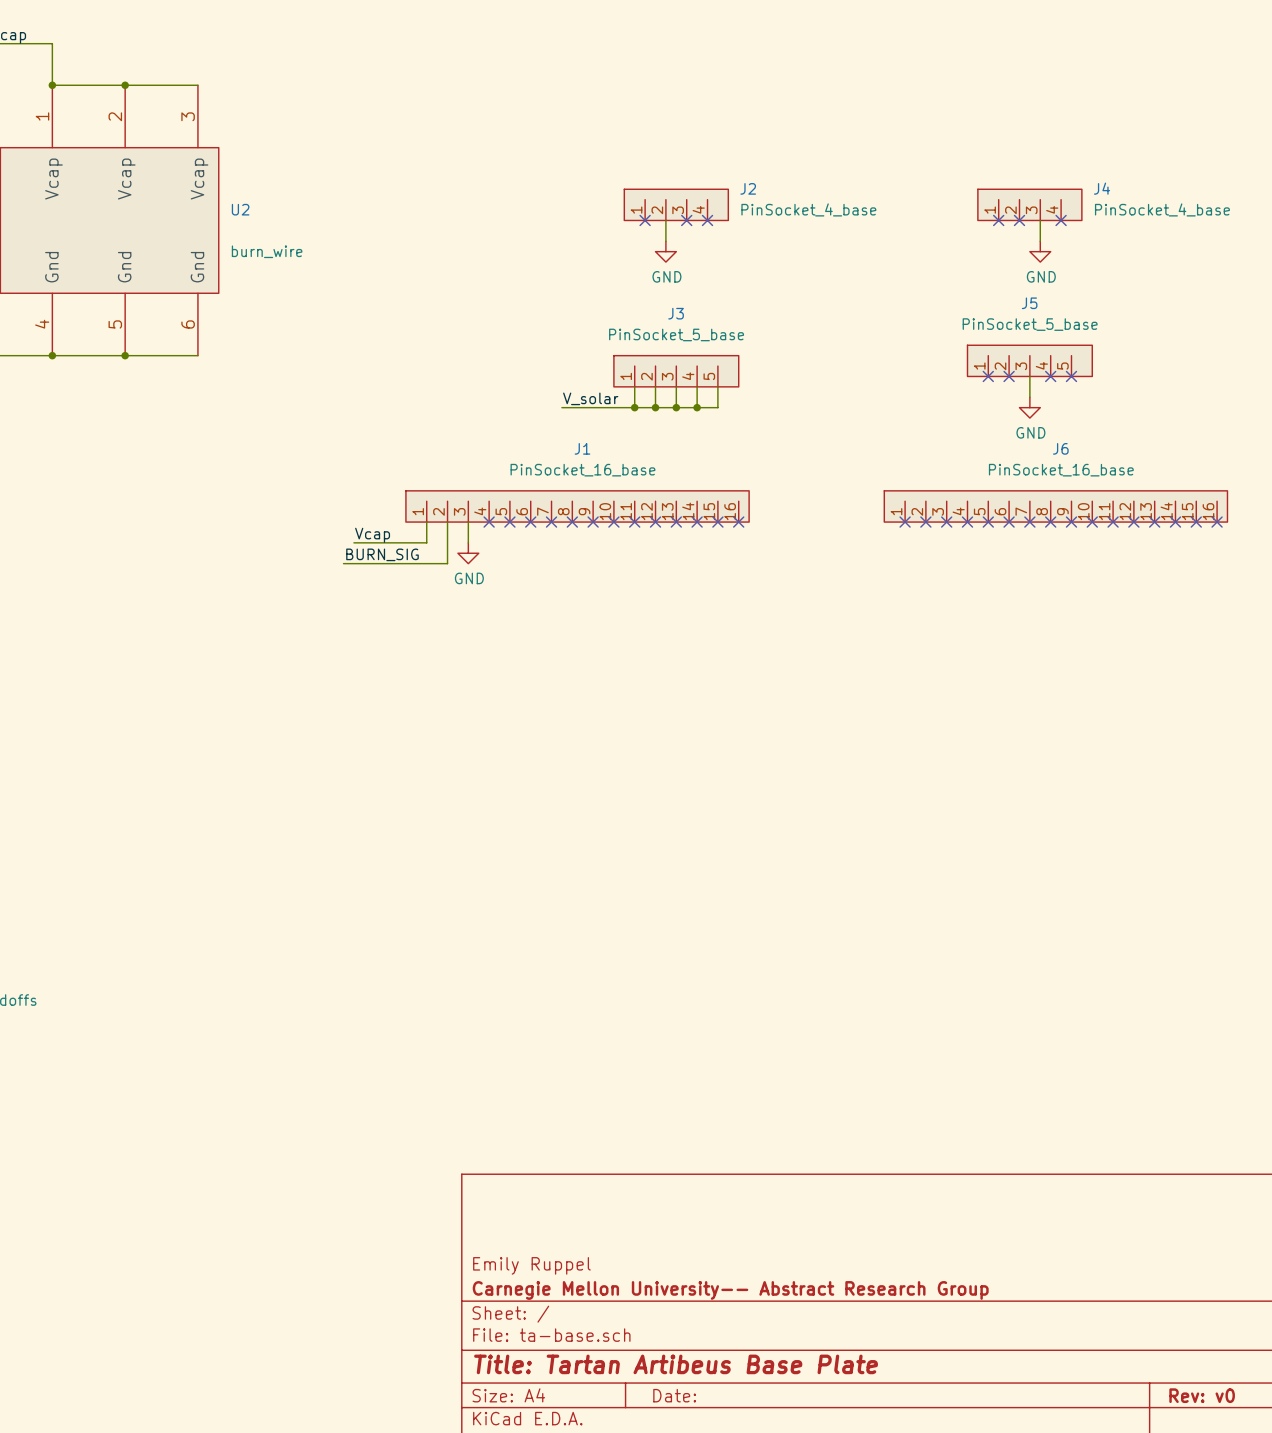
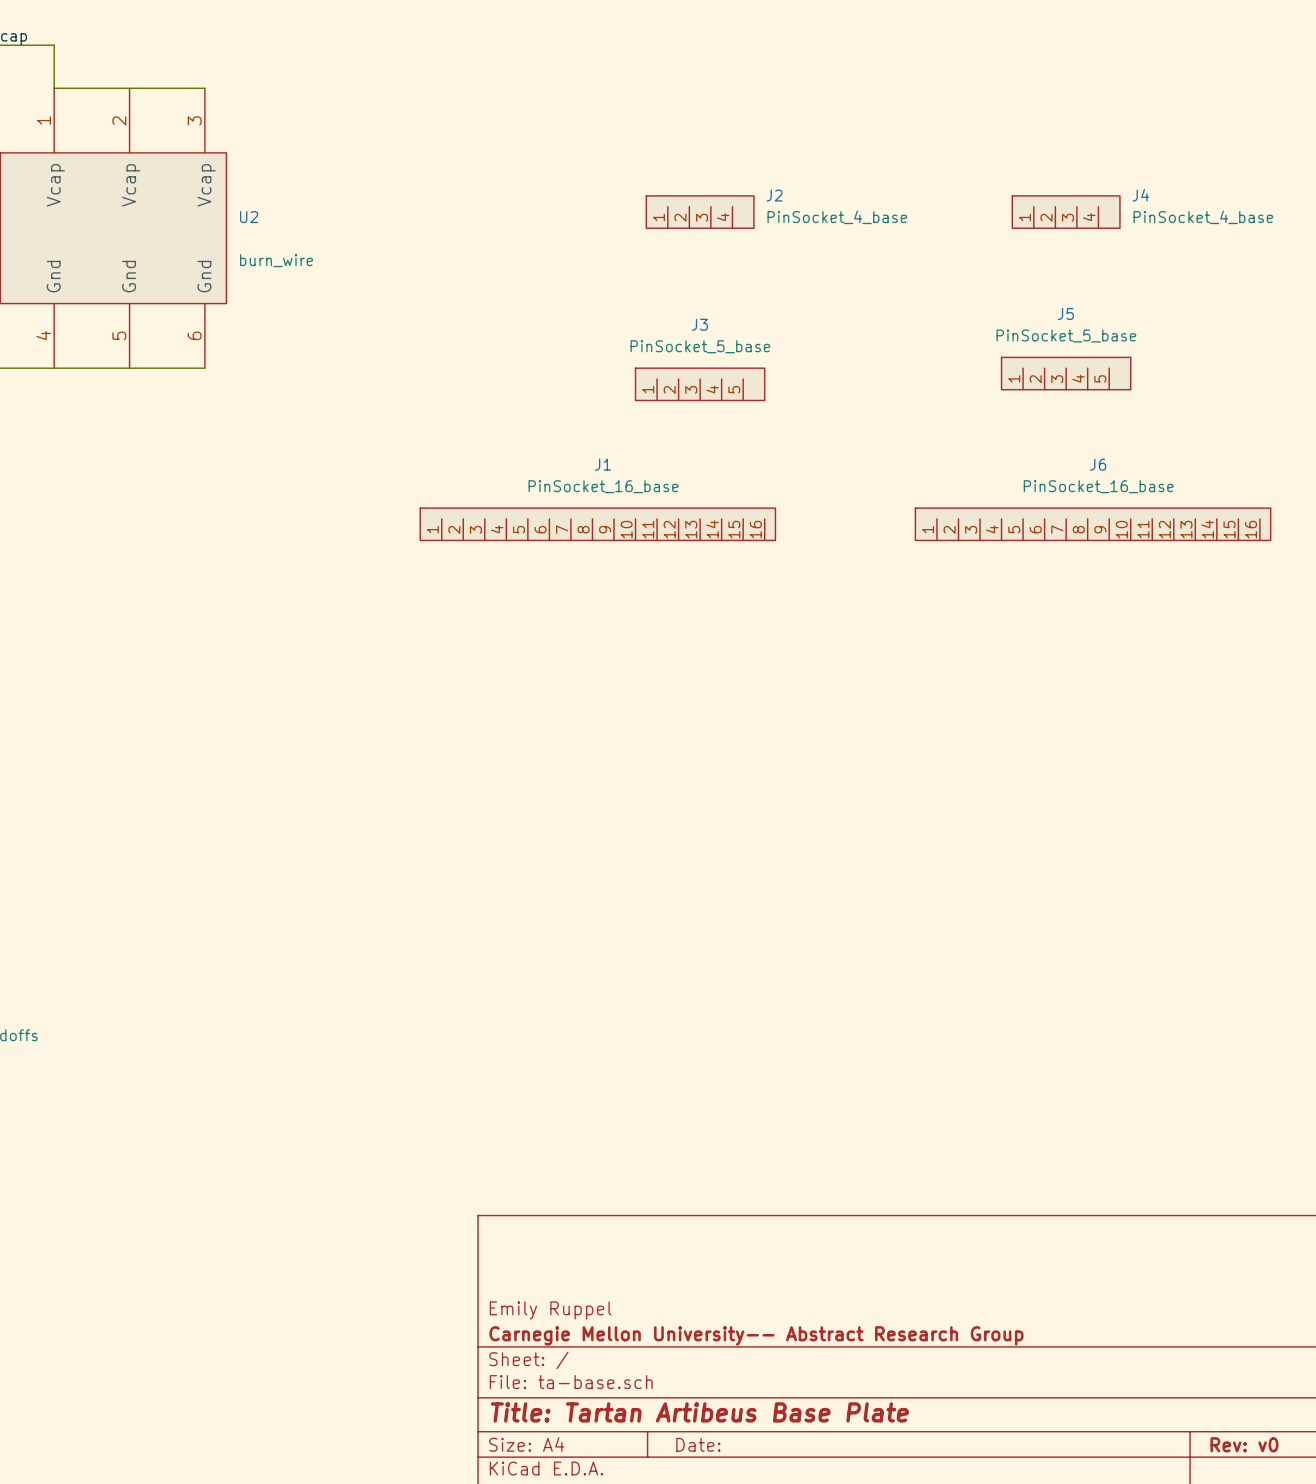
junction: (52, 85) -> none
junction: (125, 85) -> none
no-connect mark: (645, 220) -> none
wire: (665, 220) (665, 241) -> none
no-connect mark: (686, 220) -> none
no-connect mark: (707, 220) -> none
no-connect mark: (998, 220) -> none
no-connect mark: (1019, 220) -> none
wire: (1040, 220) (1040, 241) -> none
no-connect mark: (1061, 220) -> none
power symbol: GND (665, 251) -> none
power symbol: GND (1040, 251) -> none
junction: (52, 355) -> none
junction: (125, 355) -> none
no-connect mark: (988, 376) -> none
no-connect mark: (1009, 376) -> none
wire: (1029, 376) (1029, 397) -> none
no-connect mark: (1050, 376) -> none
no-connect mark: (1071, 376) -> none
wire: (634, 386) (634, 407) -> none
wire: (655, 386) (655, 407) -> none
wire: (676, 386) (676, 407) -> none
wire: (697, 386) (697, 407) -> none
wire: (717, 386) (717, 407) (561, 407) -> none
label: V_solar (590, 398) -> none
junction: (634, 407) -> none
junction: (655, 407) -> none
junction: (676, 407) -> none
junction: (697, 407) -> none
power symbol: GND (1029, 407) -> none
wire: (426, 522) (426, 542) (353, 542) -> none
wire: (447, 522) (447, 563) (343, 563) -> none
wire: (468, 522) (468, 542) -> none
no-connect mark: (489, 522) -> none
no-connect mark: (509, 522) -> none
no-connect mark: (530, 522) -> none
no-connect mark: (551, 522) -> none
no-connect mark: (572, 522) -> none
no-connect mark: (593, 522) -> none
no-connect mark: (613, 522) -> none
no-connect mark: (634, 522) -> none
no-connect mark: (655, 522) -> none
no-connect mark: (676, 522) -> none
no-connect mark: (697, 522) -> none
no-connect mark: (717, 522) -> none
no-connect mark: (738, 522) -> none
no-connect mark: (905, 522) -> none
no-connect mark: (925, 522) -> none
no-connect mark: (946, 522) -> none
no-connect mark: (967, 522) -> none
no-connect mark: (988, 522) -> none
no-connect mark: (1009, 522) -> none
no-connect mark: (1029, 522) -> none
no-connect mark: (1050, 522) -> none
no-connect mark: (1071, 522) -> none
no-connect mark: (1092, 522) -> none
no-connect mark: (1113, 522) -> none
no-connect mark: (1133, 522) -> none
no-connect mark: (1154, 522) -> none
no-connect mark: (1175, 522) -> none
no-connect mark: (1196, 522) -> none
no-connect mark: (1217, 522) -> none
label: Vcap (372, 535) -> none
power symbol: GND (468, 553) -> none
label: BURN_SIG (382, 554) -> none

